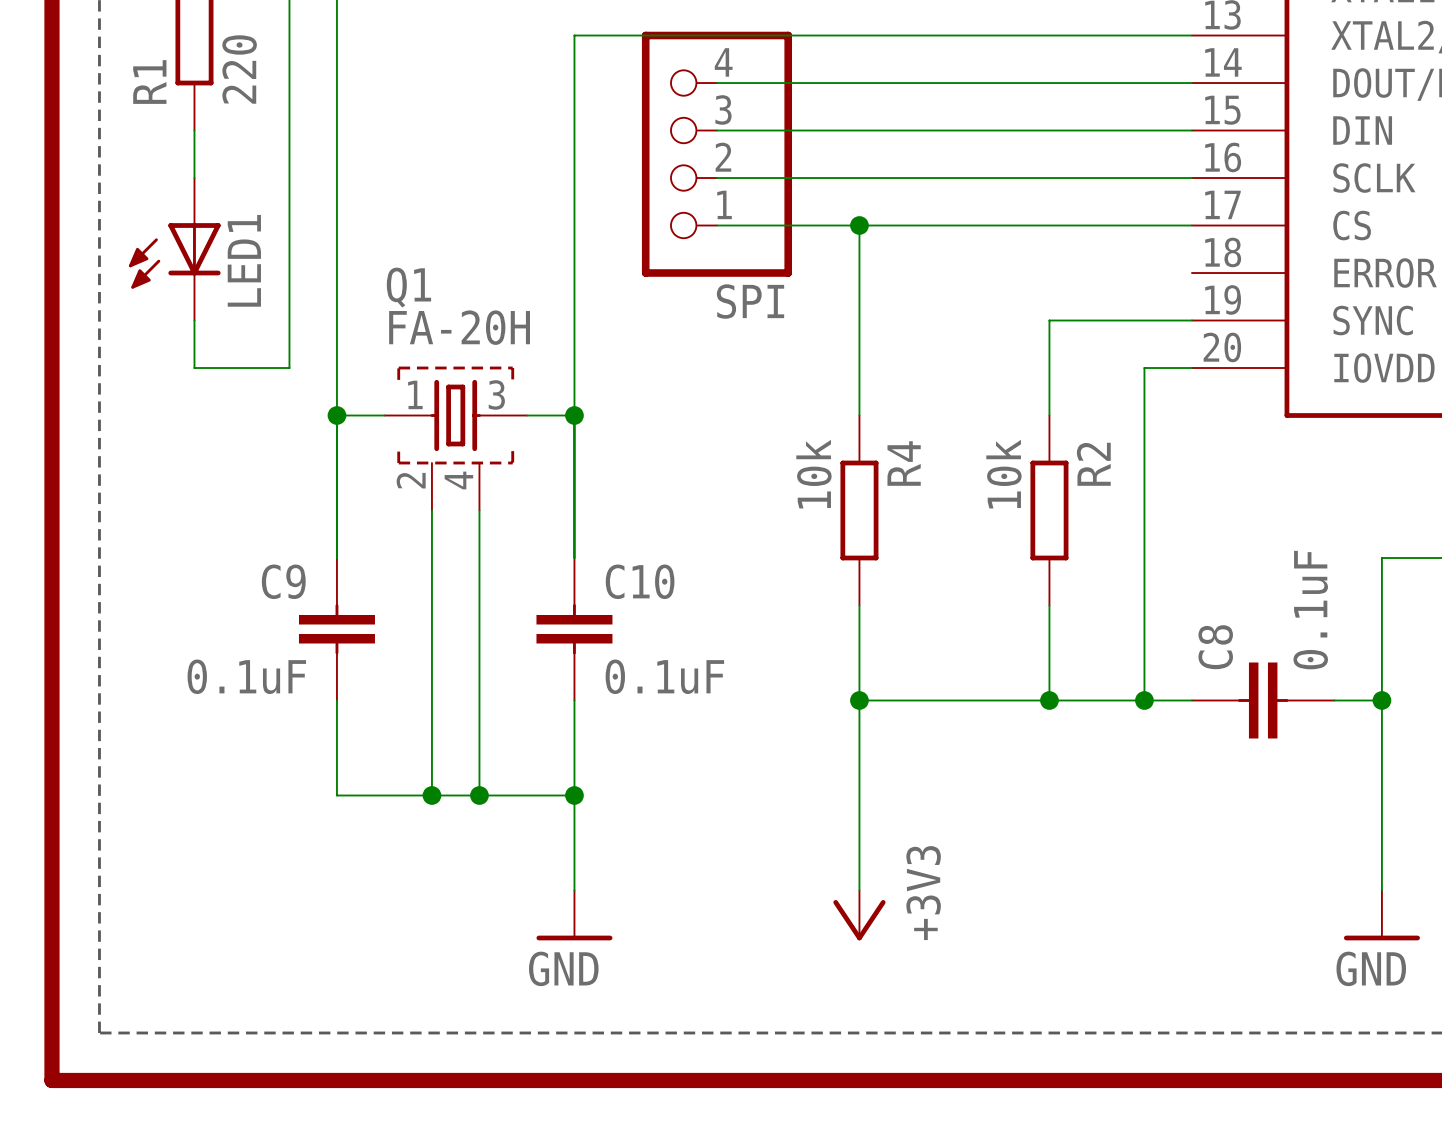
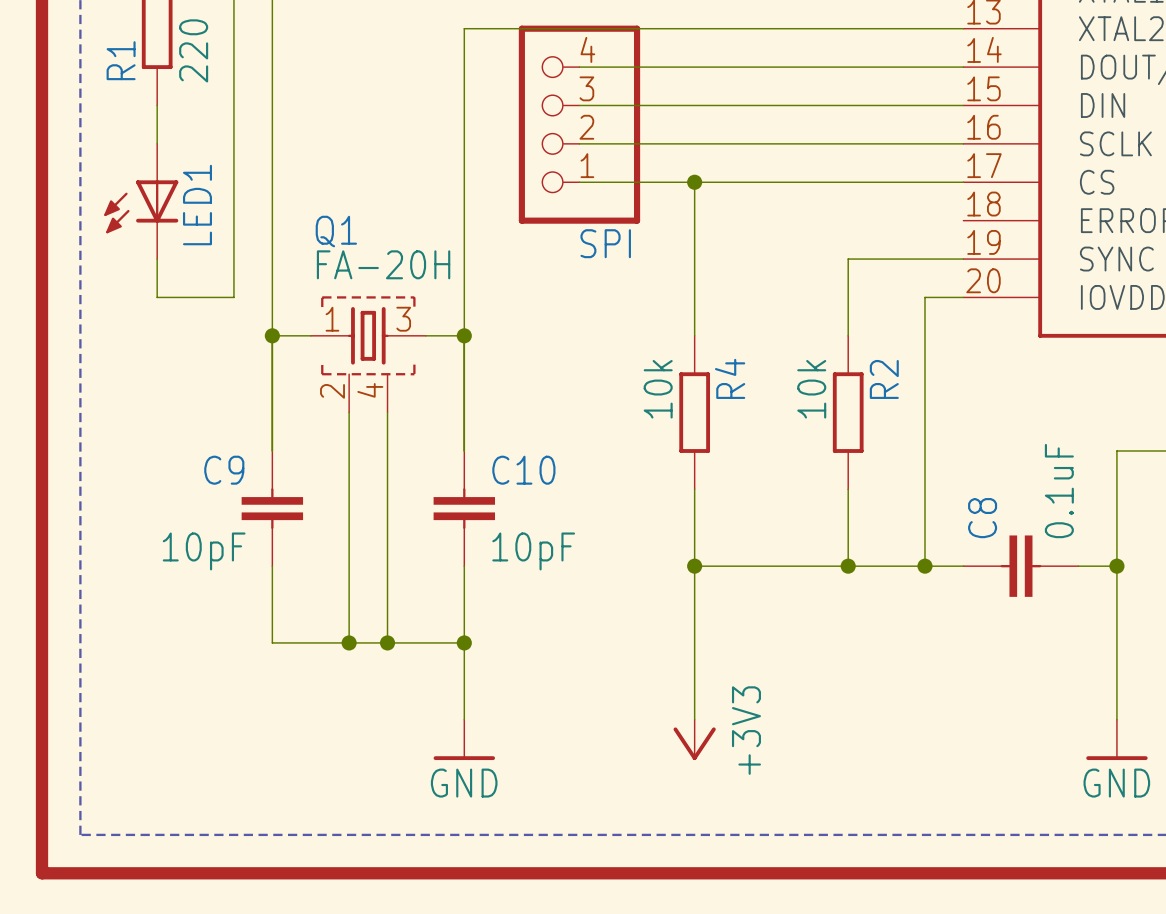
C9 value: 0.1uF (246, 676) -> 10pF (204, 551)
C10 value: 0.1uF (664, 676) -> 10pF (533, 551)

